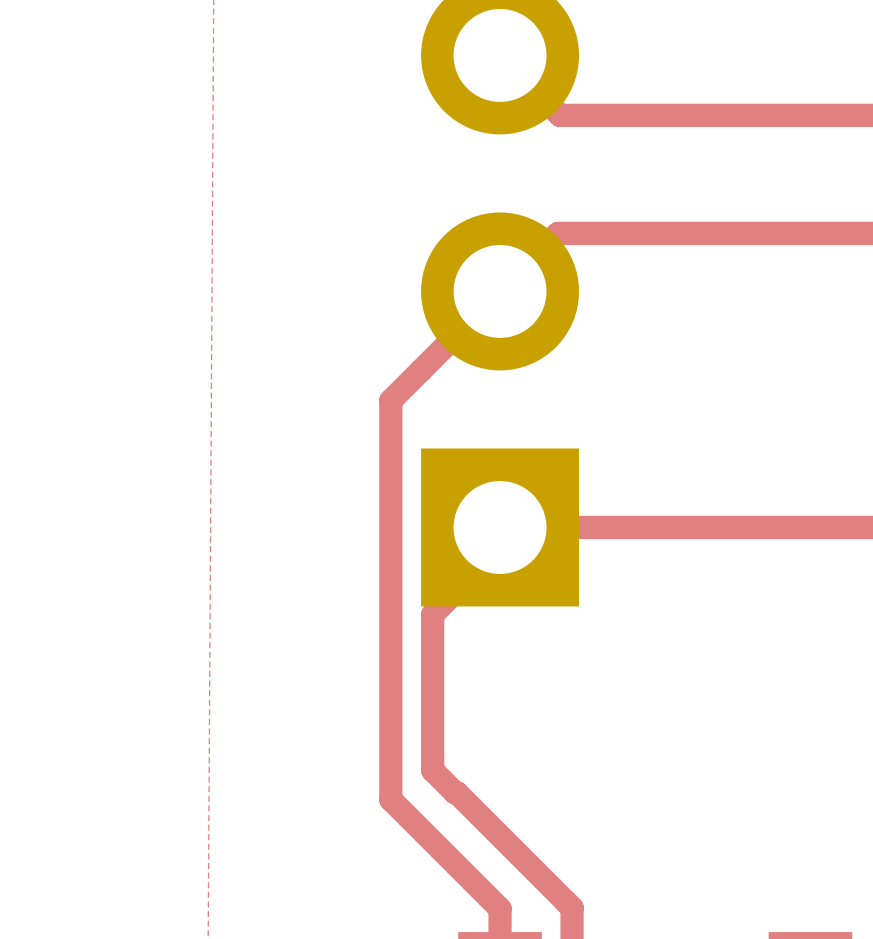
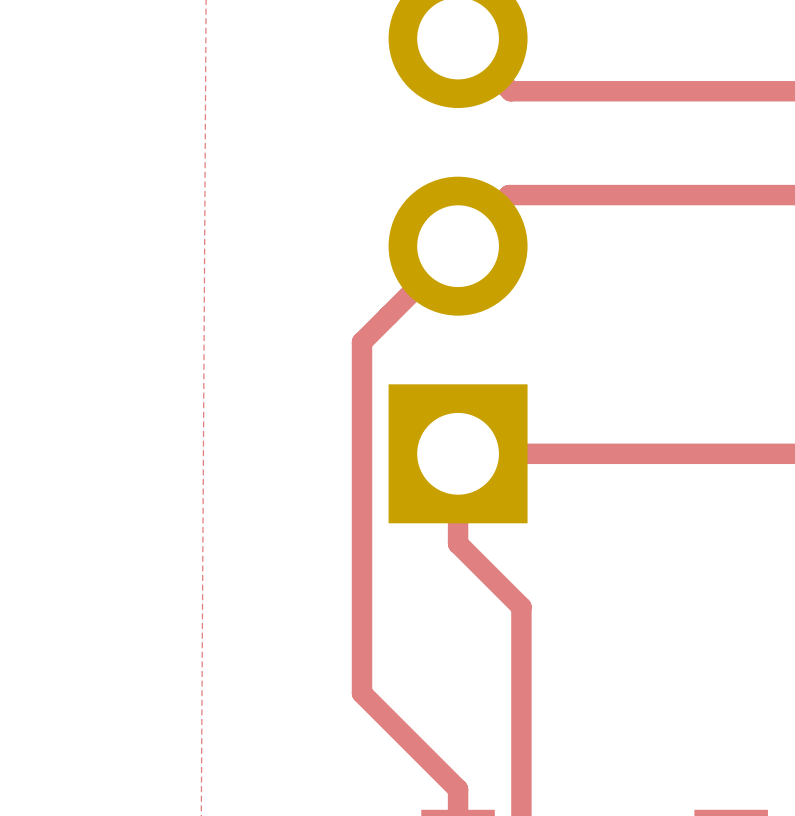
top track: (500, 547) (432, 614) (432, 770) (572, 907) -> (458, 471) (458, 543) (521, 607) (521, 788)

